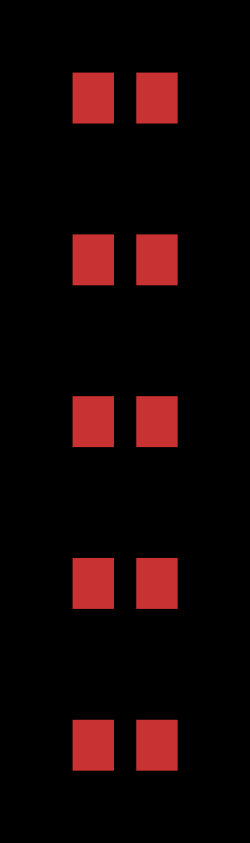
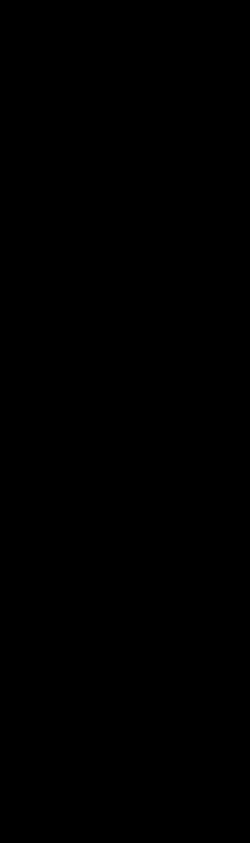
part: (125, 98) -> none
part: (125, 259) -> none
part: (125, 421) -> none
part: (125, 583) -> none
part: (125, 745) -> none

